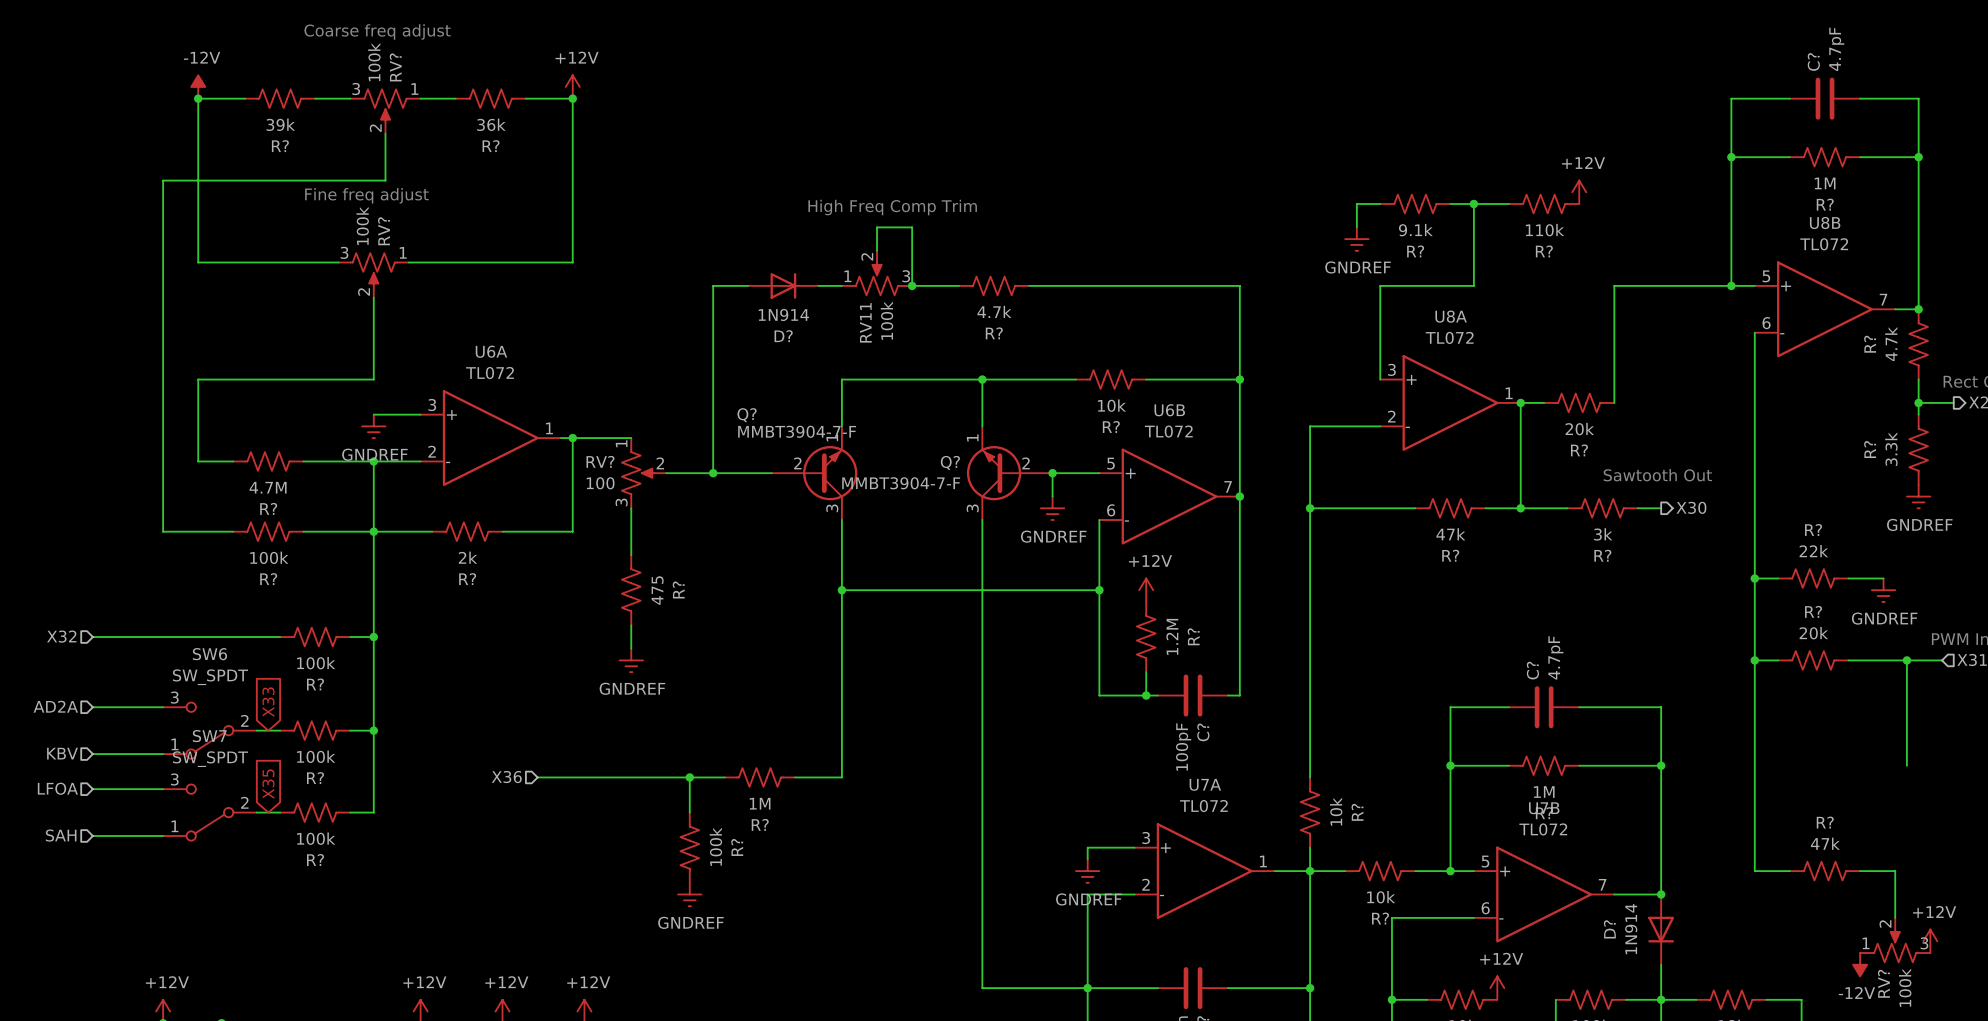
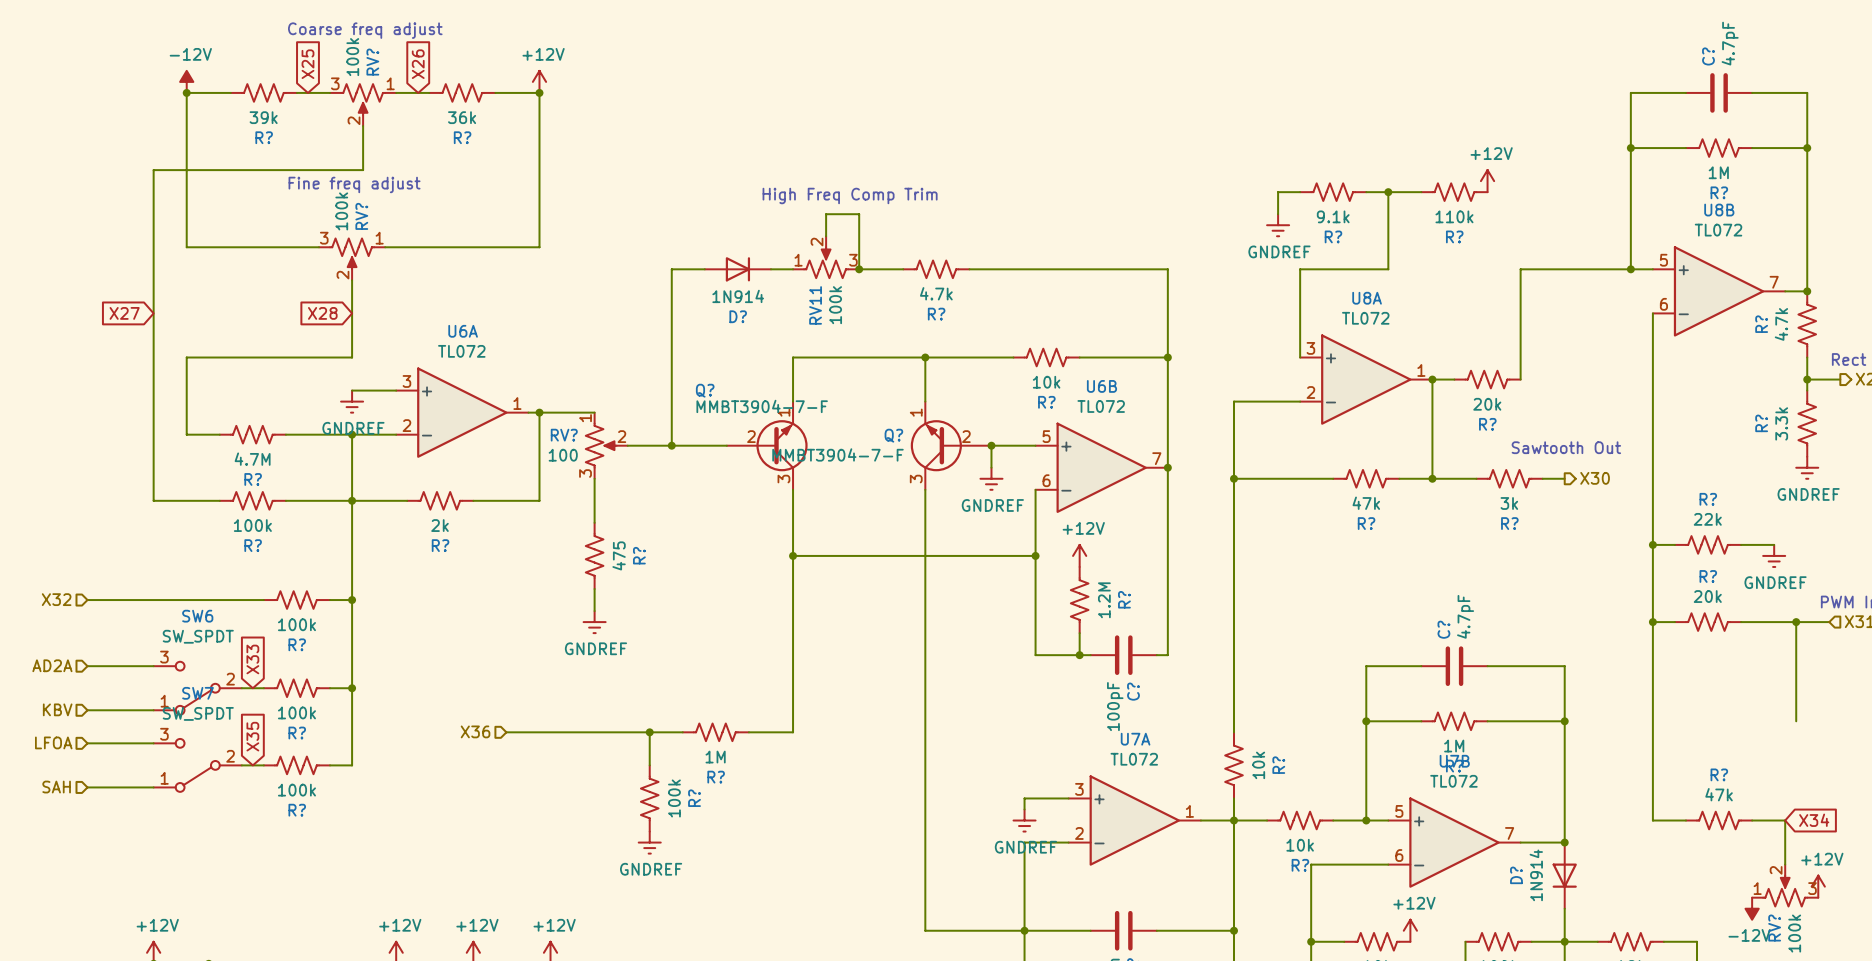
global label: none -> X25 (307, 64)
global label: none -> X26 (418, 64)
global label: none -> X27 (124, 313)
global label: none -> X28 (322, 313)
global label: none -> X34 (1814, 820)

